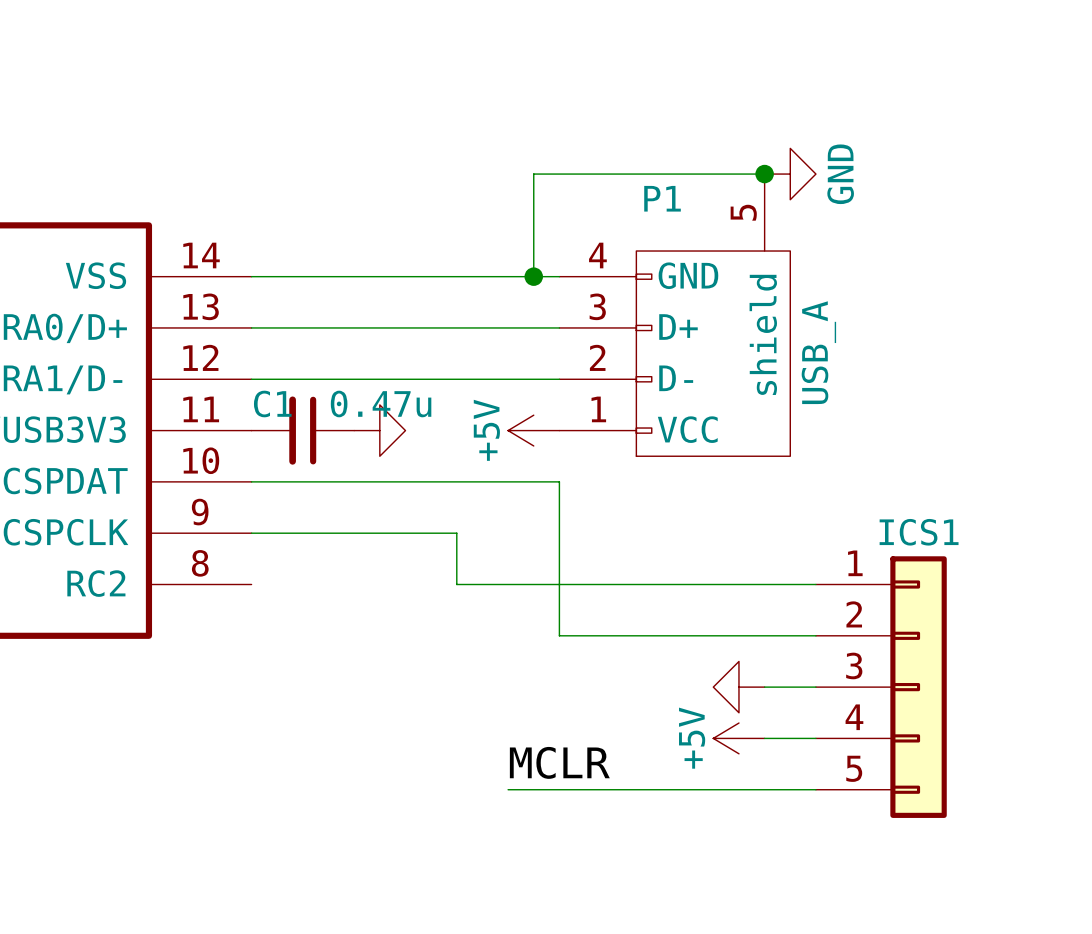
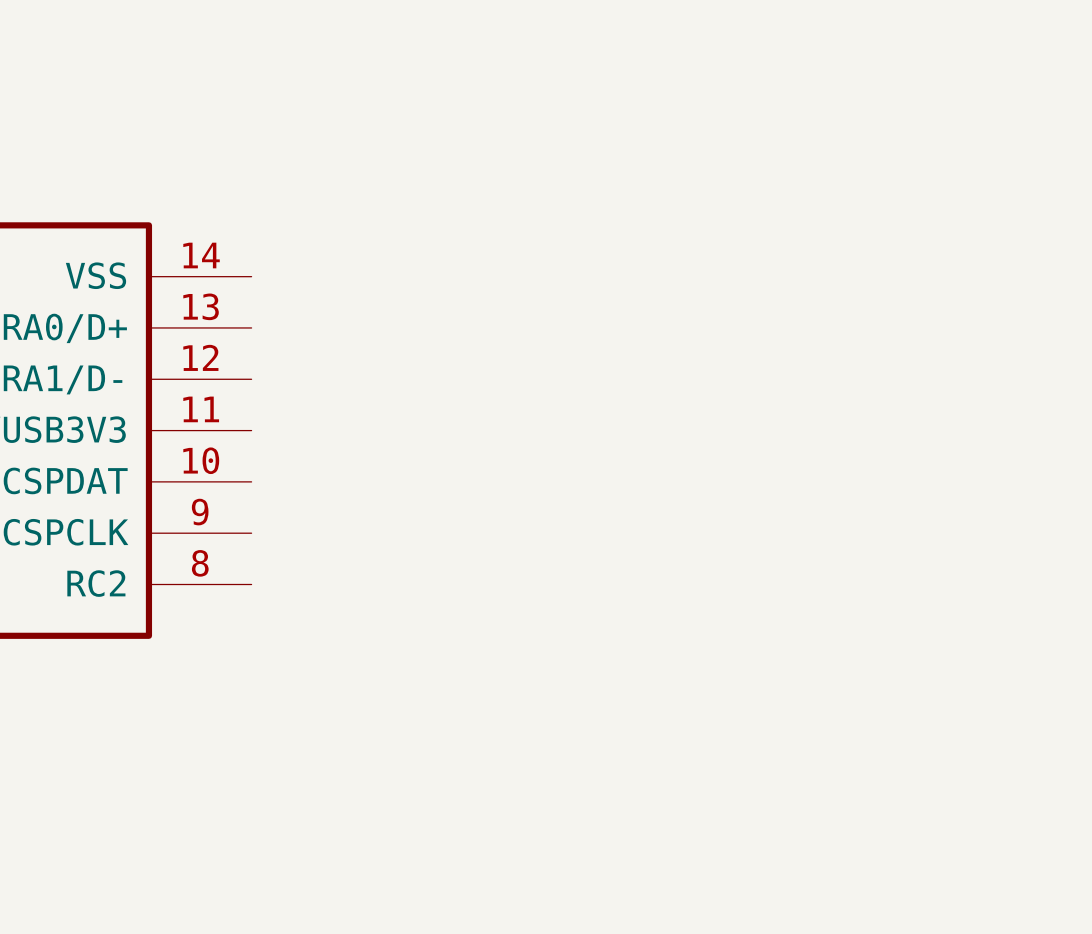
wire: (764, 174) (533, 174) (533, 276) -> none
junction: (764, 174) -> none
power symbol: GND (790, 174) -> none
wire: (251, 276) (559, 276) -> none
junction: (533, 276) -> none
P1: USB_A (674, 315) -> none
wire: (251, 327) (559, 327) -> none
wire: (251, 379) (559, 379) -> none
C1: 0.47u (302, 430) -> none
power symbol: (379, 430) -> none
power symbol: +5V (533, 430) -> none
wire: (251, 481) (559, 481) (559, 635) (815, 635) -> none
wire: (251, 533) (456, 533) (456, 584) (815, 584) -> none
power symbol: (738, 687) -> none
wire: (764, 687) (815, 687) -> none
ICS1: (881, 687) -> none
power symbol: +5V (738, 738) -> none
wire: (764, 738) (815, 738) -> none
label: MCLR (559, 762) -> none
wire: (508, 789) (815, 789) -> none

